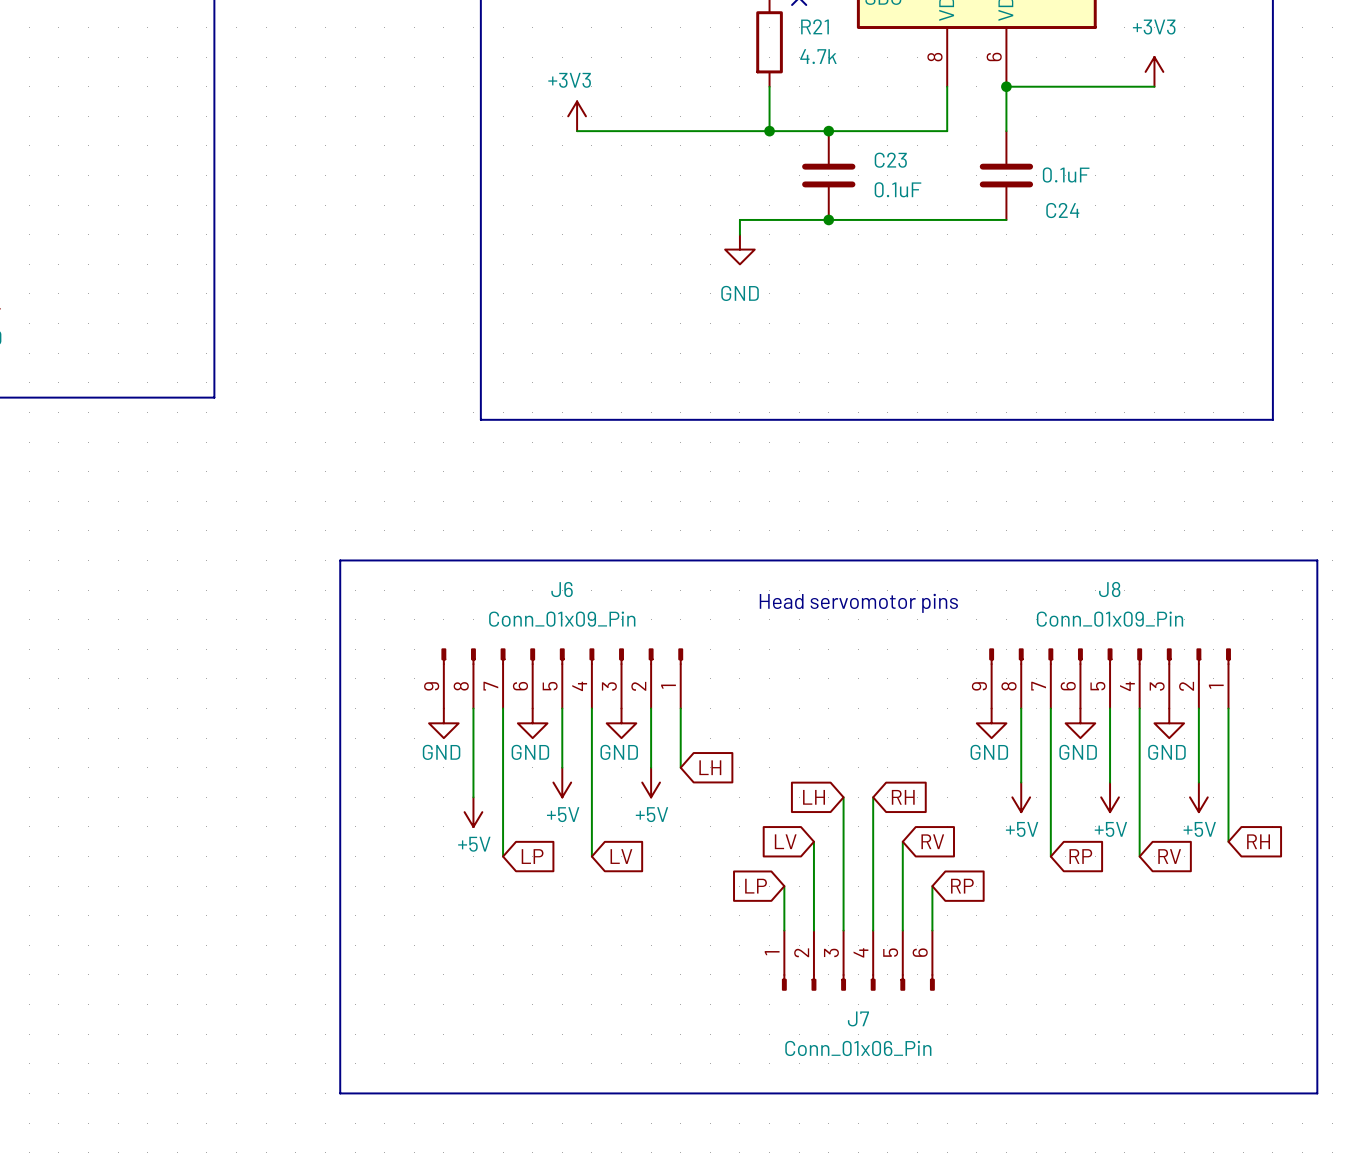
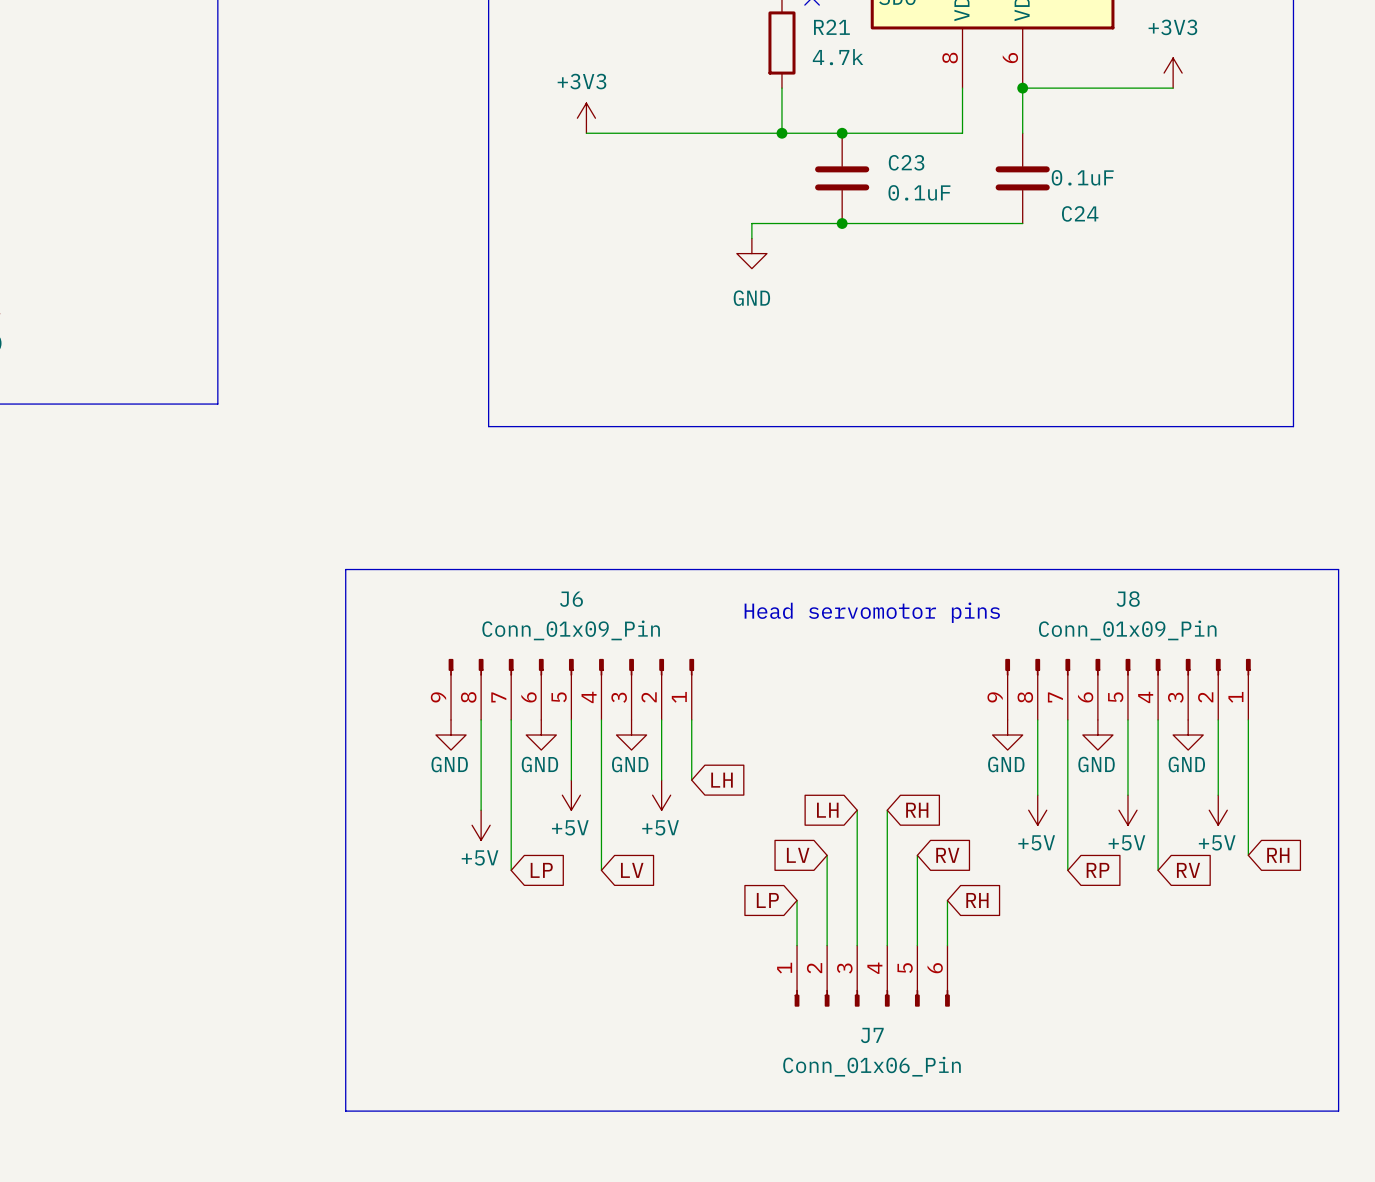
global label: RP (962, 886) -> RH (977, 900)

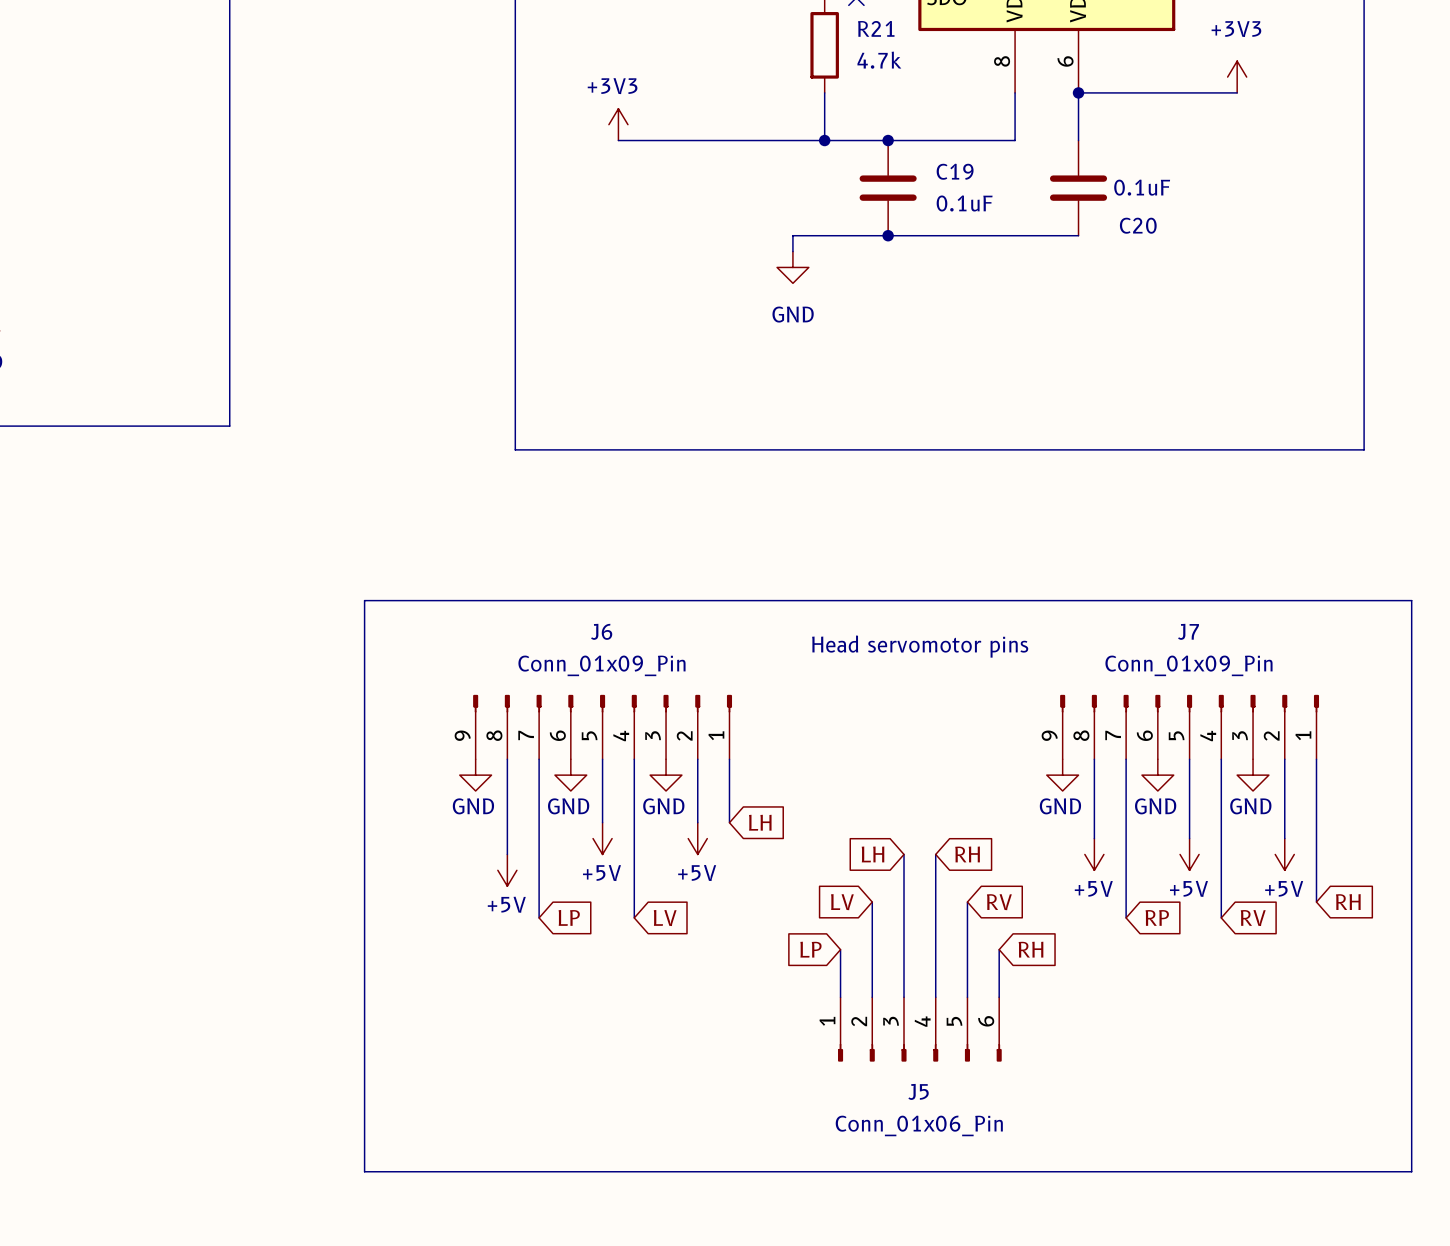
C23 name: C23 (906, 162) -> C19 (955, 171)
C24 name: C24 (1080, 213) -> C20 (1138, 225)
J8 name: J8 (1128, 599) -> J7 (1188, 631)
J7 name: J7 (872, 1035) -> J5 (918, 1091)

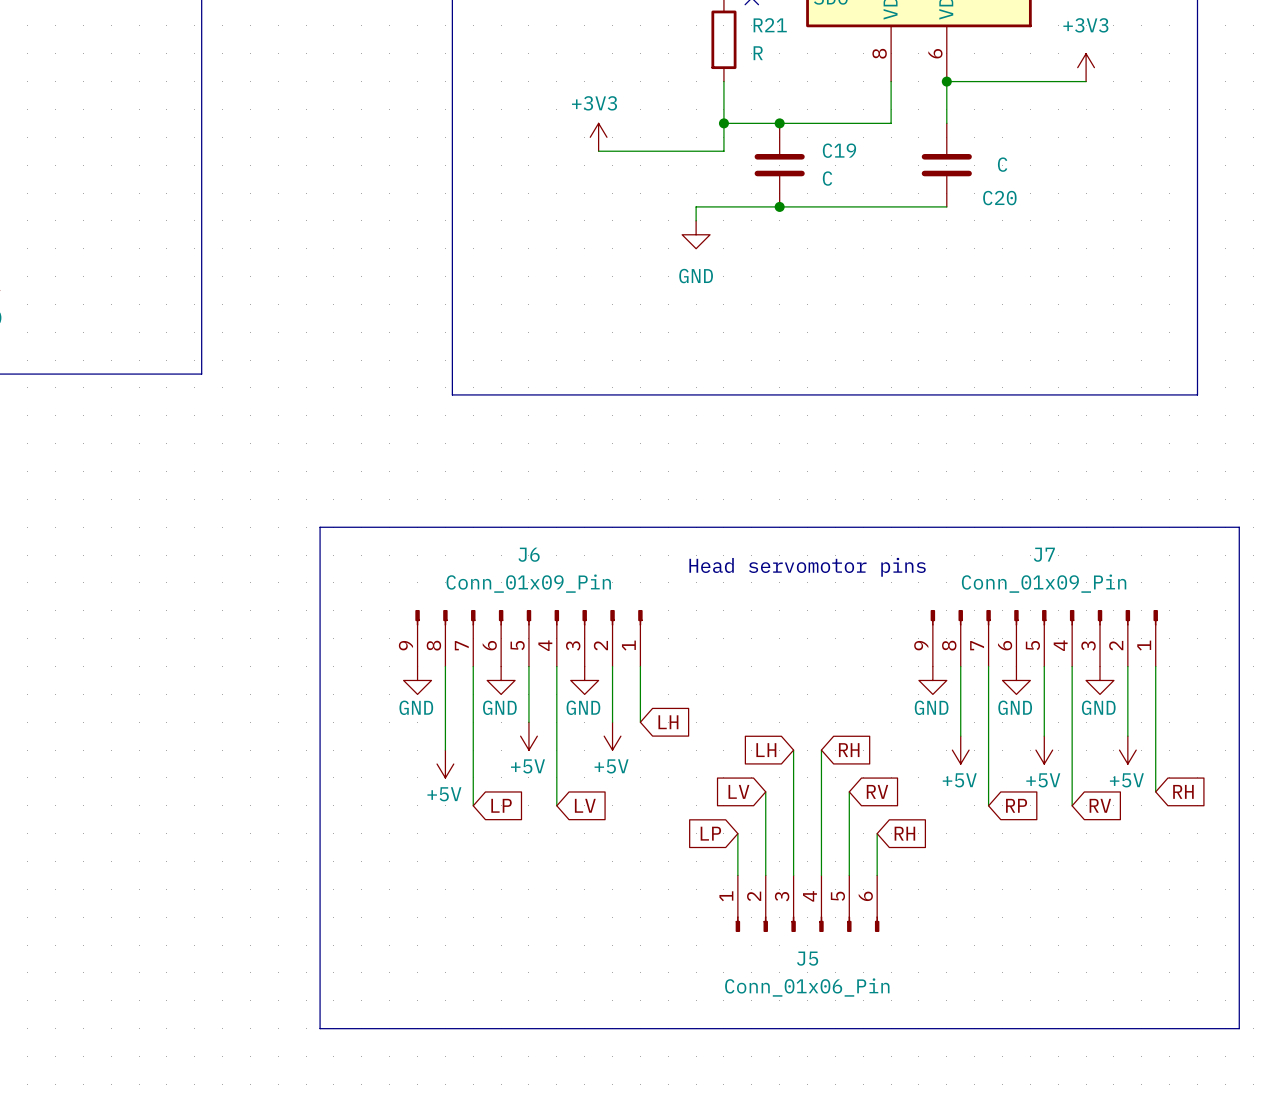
R21 value: 4.7k (879, 60) -> R (758, 53)
power symbol position: +3V3 (618, 124) -> +3V3 (598, 137)
wire: (618, 140) (824, 140) -> (598, 151) (723, 151) (723, 123)
C20 value: 0.1uF (1142, 187) -> C (1002, 164)
C19 value: 0.1uF (964, 203) -> C (827, 178)

